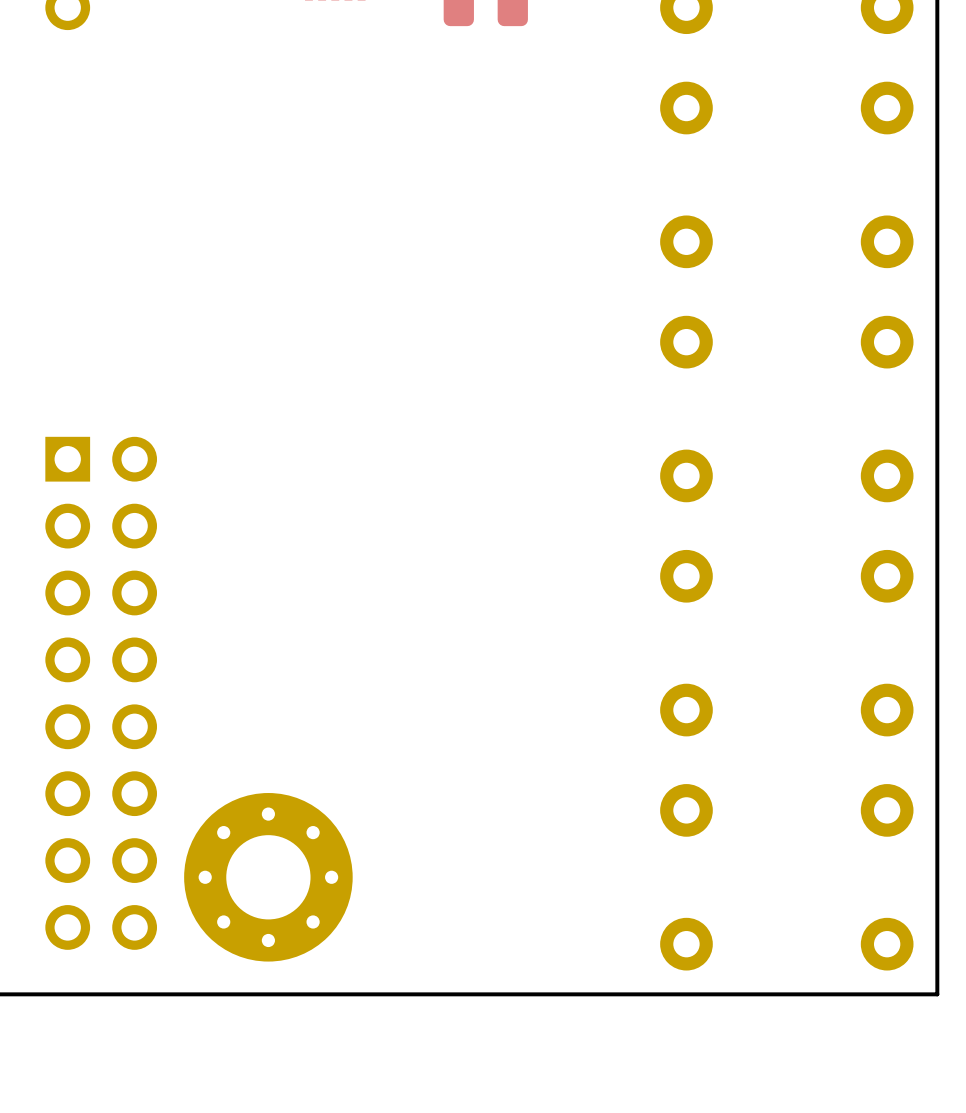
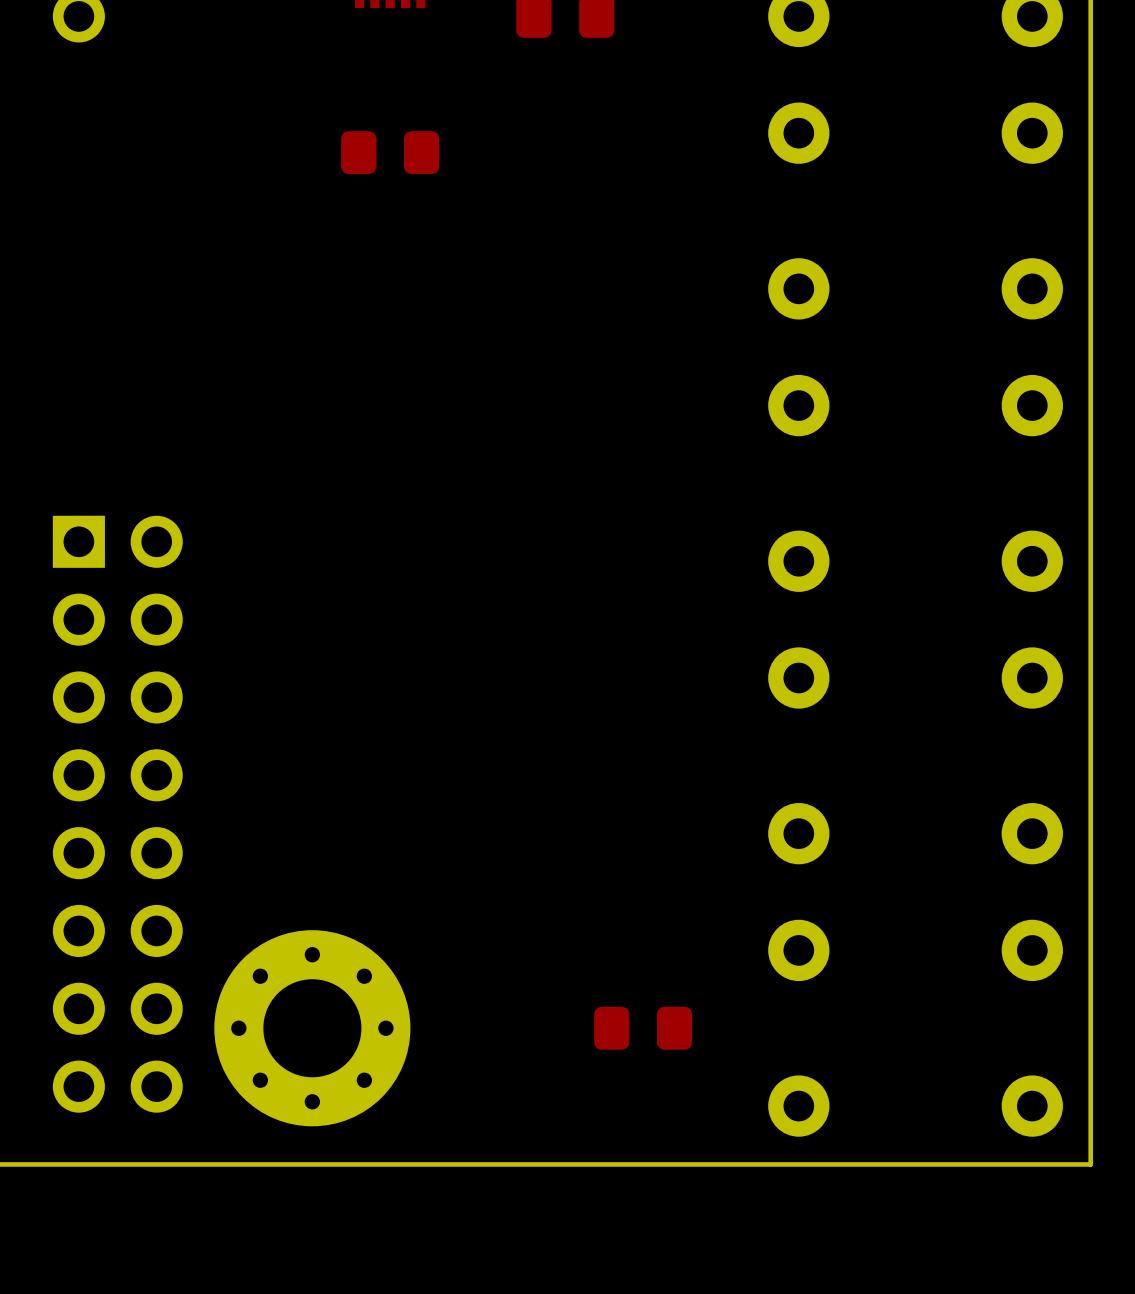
part: none -> (390, 152)
part: none -> (643, 1028)

